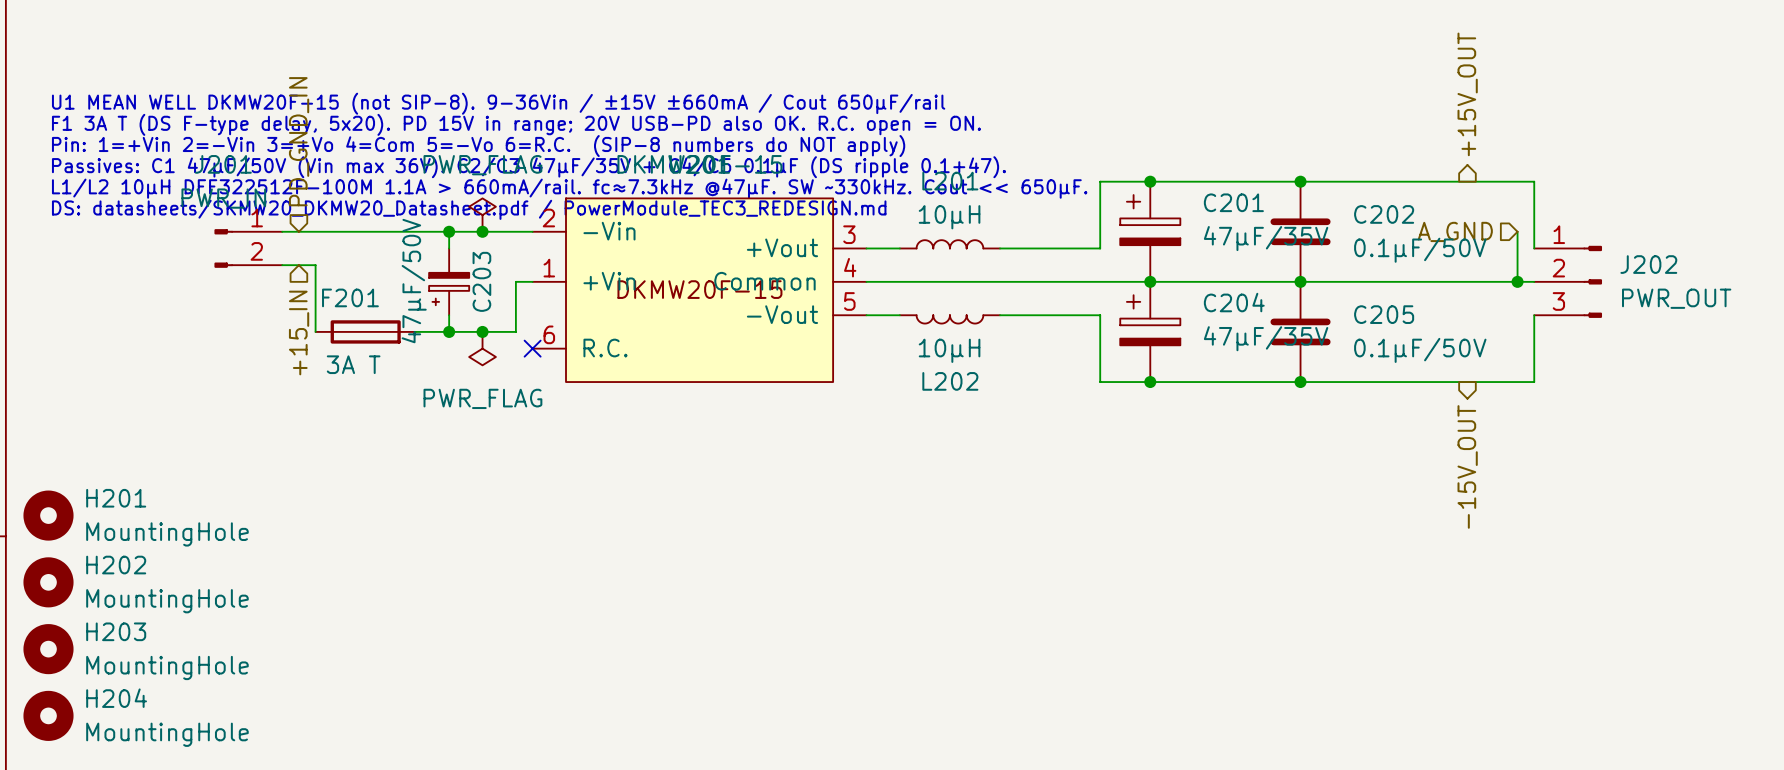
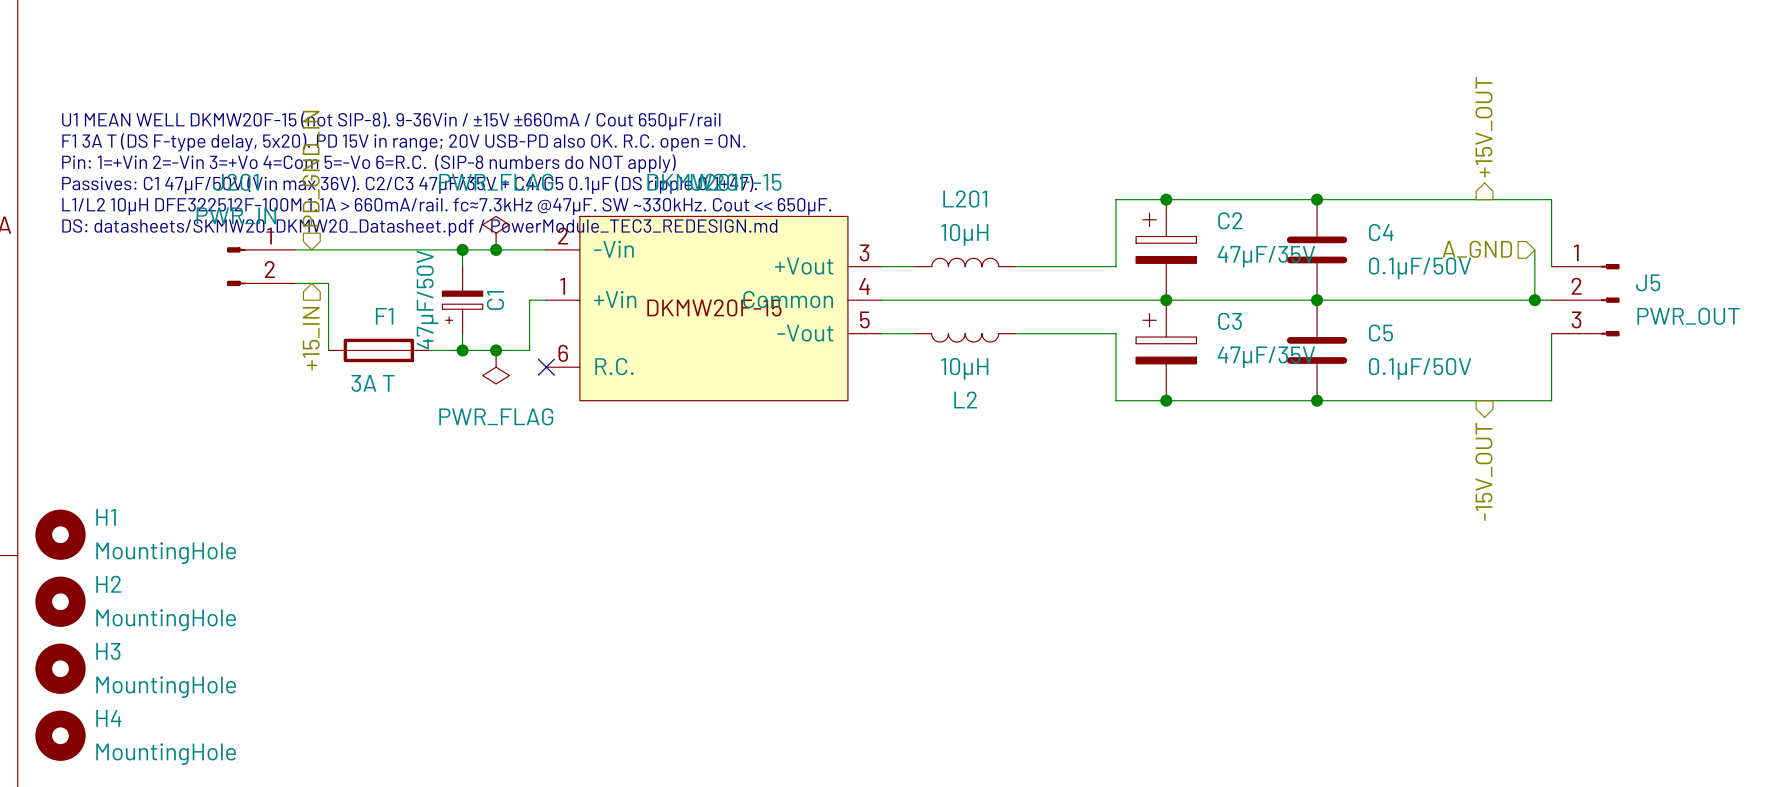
C201 name: C201 (1233, 202) -> C2 (1230, 220)
C202 name: C202 (1384, 214) -> C4 (1381, 232)
J202 name: J202 (1648, 264) -> J5 (1648, 282)
C203 name: C203 (481, 281) -> C1 (495, 300)
F201 name: F201 (350, 297) -> F1 (384, 316)
C204 name: C204 (1234, 302) -> C3 (1230, 321)
C205 name: C205 (1384, 314) -> C5 (1380, 333)
L202 name: L202 (950, 381) -> L2 (965, 399)
H201 name: H201 (116, 498) -> H1 (106, 517)
H202 name: H202 (116, 565) -> H2 (108, 584)
H203 name: H203 (116, 631) -> H3 (108, 651)
H204 name: H204 (116, 698) -> H4 (108, 718)

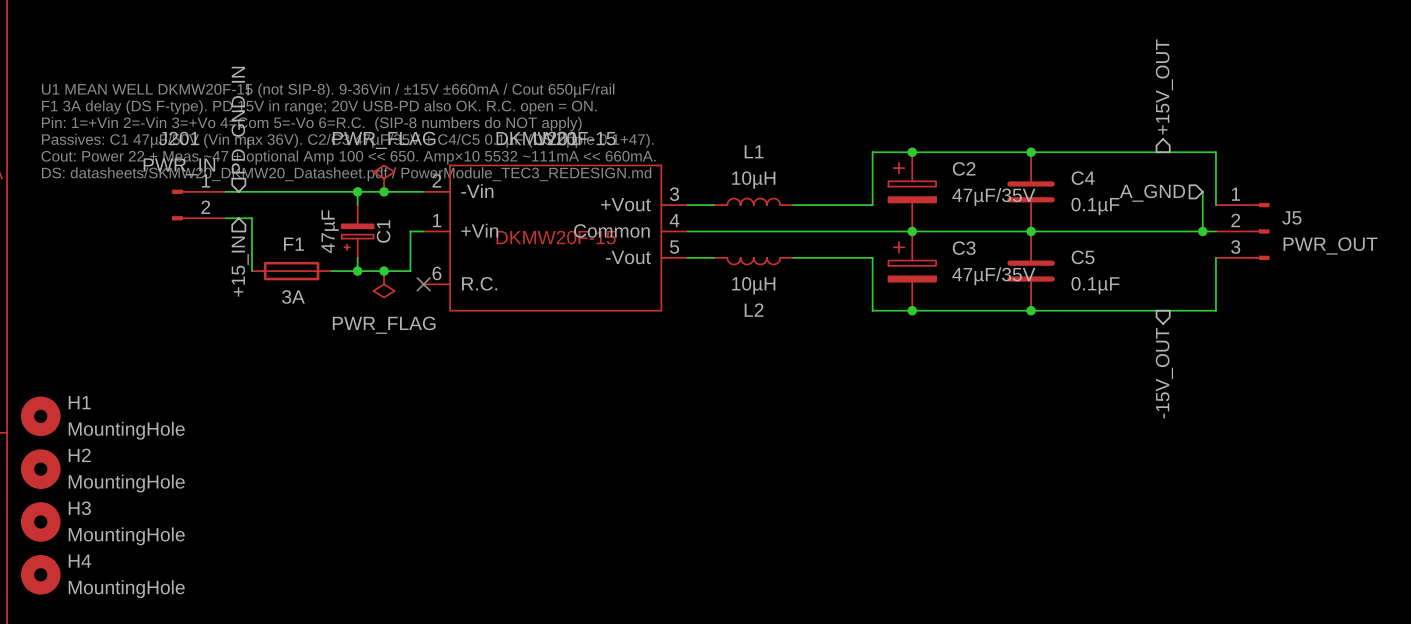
text: F1 3A T (DS F-type delay, 5x20). PD 15V in range; 20V USB-PD also OK. R.C. open = ON. (403, 142) -> F1 3A delay (DS F-type). PD 15V in range; 20V USB-PD also OK. R.C. open = ON. (319, 107)
L201 name: L201 (965, 199) -> L1 (754, 151)
text: L1/L2 10µH DFE322512F-100M 1.1A > 660mA/rail. fc≈7.3kHz @47µF. SW ~330kHz. Cout << 650µF. (446, 206) -> Cout: Power 22 + Meas ~47 + optional Amp 100 << 650. Amp×10 5532 ~111mA << 660mA. (348, 157)
C4 value: 0.1µF/50V (1420, 268) -> 0.1µF (1095, 206)
C1 value: 47µF/50V (427, 299) -> 47µF (330, 231)
C5 value: 0.1µF/50V (1420, 368) -> 0.1µF (1095, 285)
F1 value: 3A T (373, 383) -> 3A (293, 297)

